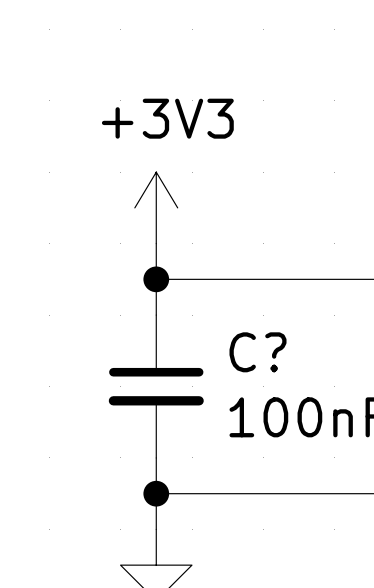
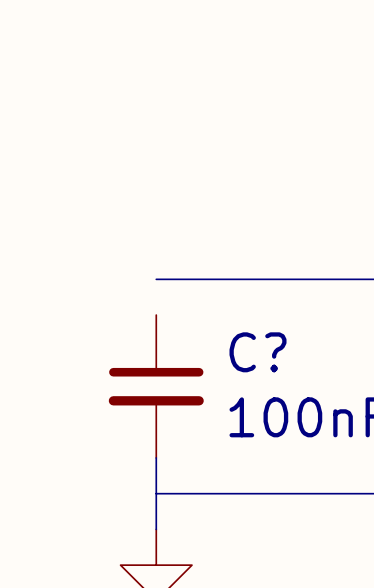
power symbol: +3V3 (156, 207) -> none
wire: (156, 243) (156, 315) -> none
junction: (156, 279) -> none
junction: (156, 493) -> none

